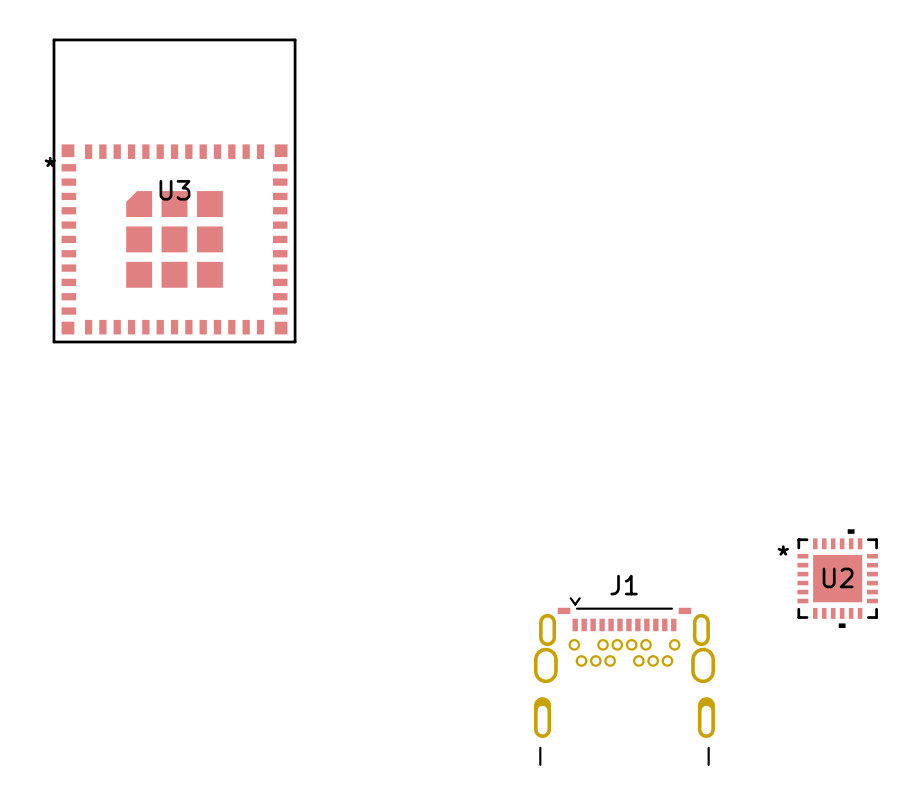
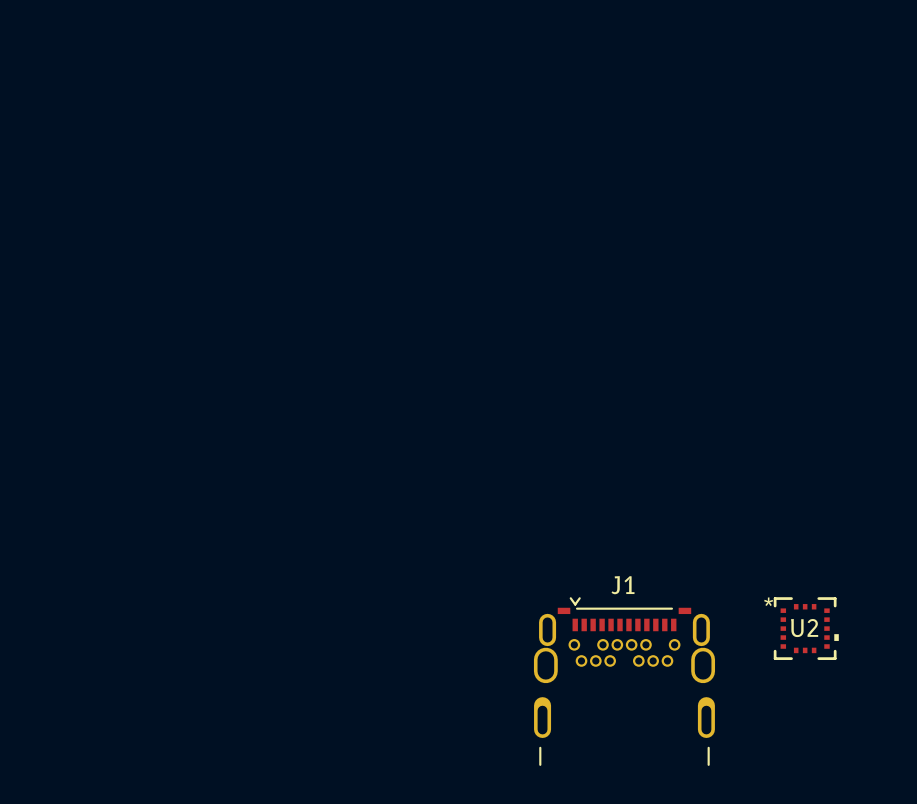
U3: (174, 190) -> none
U2 footprint: [797, 529, 878, 628] -> [773, 597, 839, 660]

